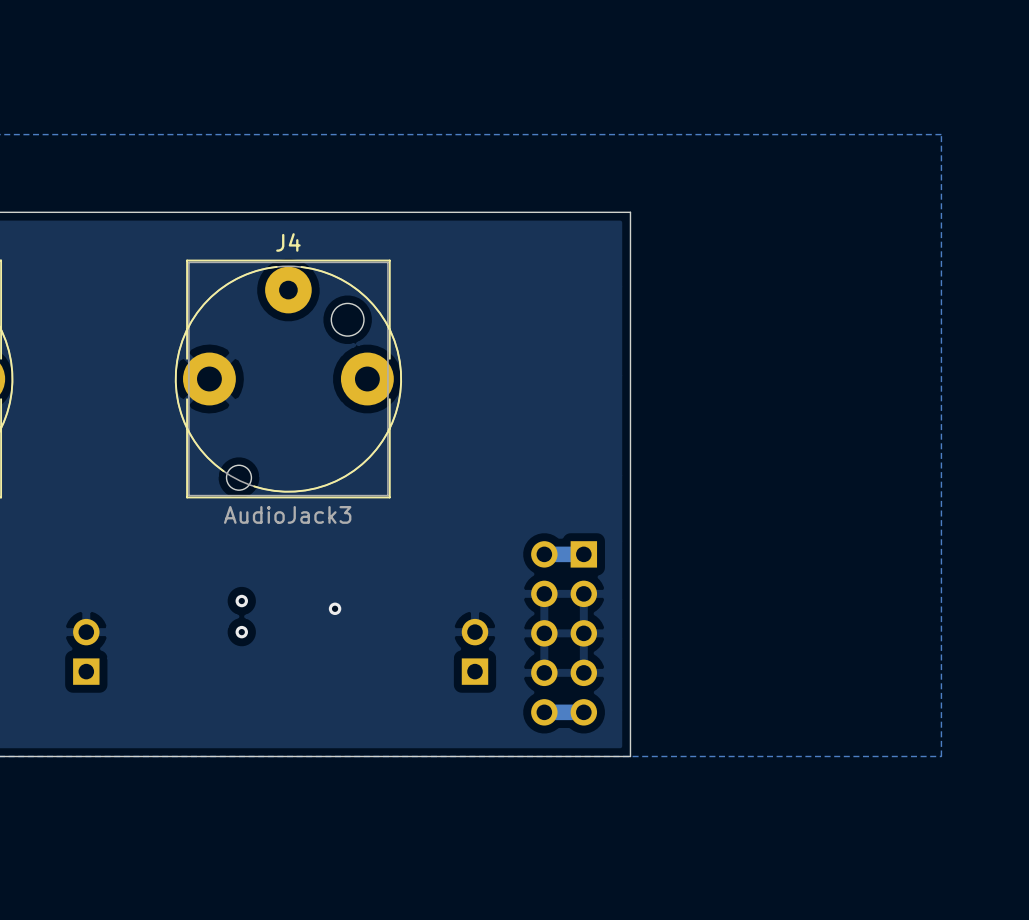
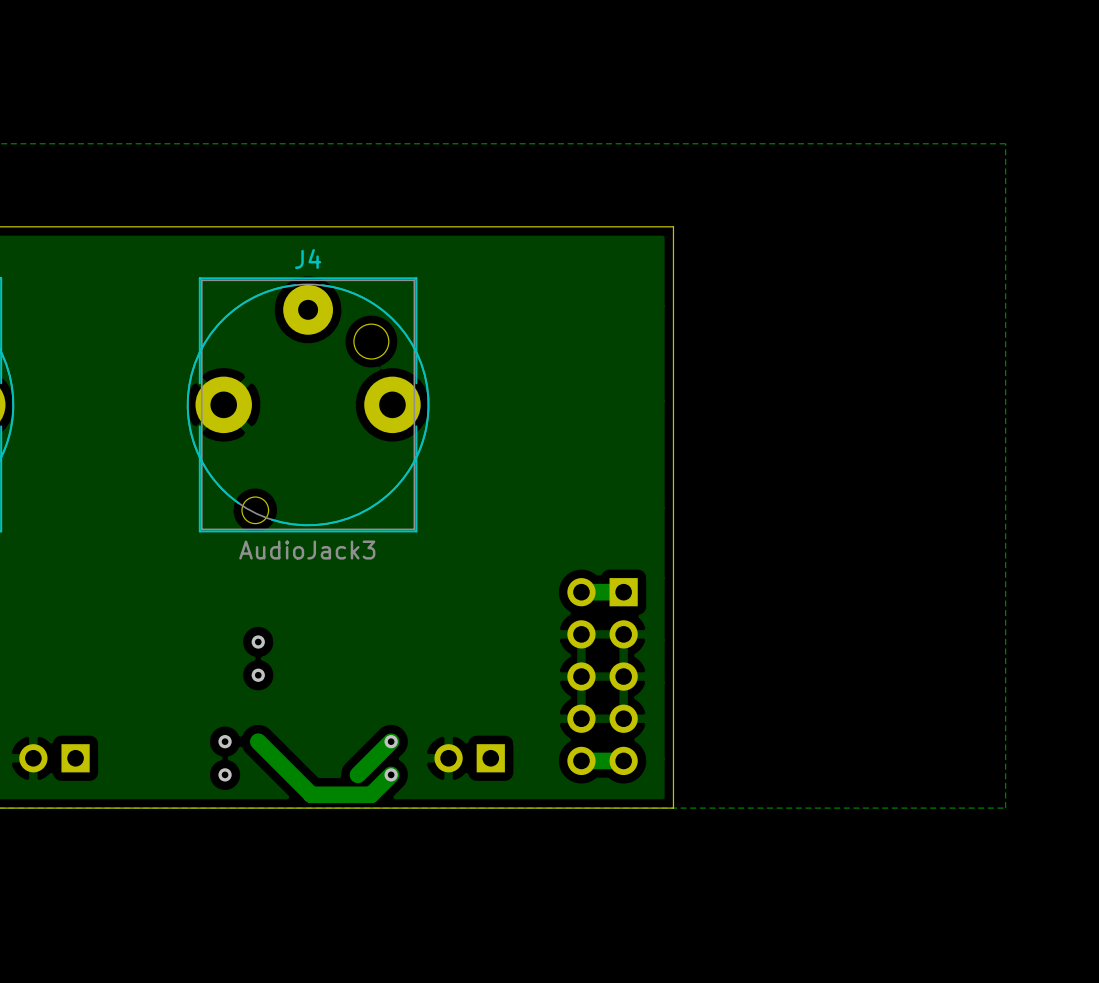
via: (335, 608) -> none
part rotation: 0° (86, 651) -> 90° counterclockwise (54, 758)
part position: (86, 651) -> (54, 758)
part rotation: 0° (474, 651) -> 90° counterclockwise (469, 758)
part position: (474, 651) -> (469, 758)
via: none -> (225, 741)
track: none -> (258, 741) (311, 794) (371, 794) (391, 774)
track: none -> (391, 741) (357, 774)
via: none -> (391, 741)
via: none -> (225, 774)
via: none -> (391, 774)

